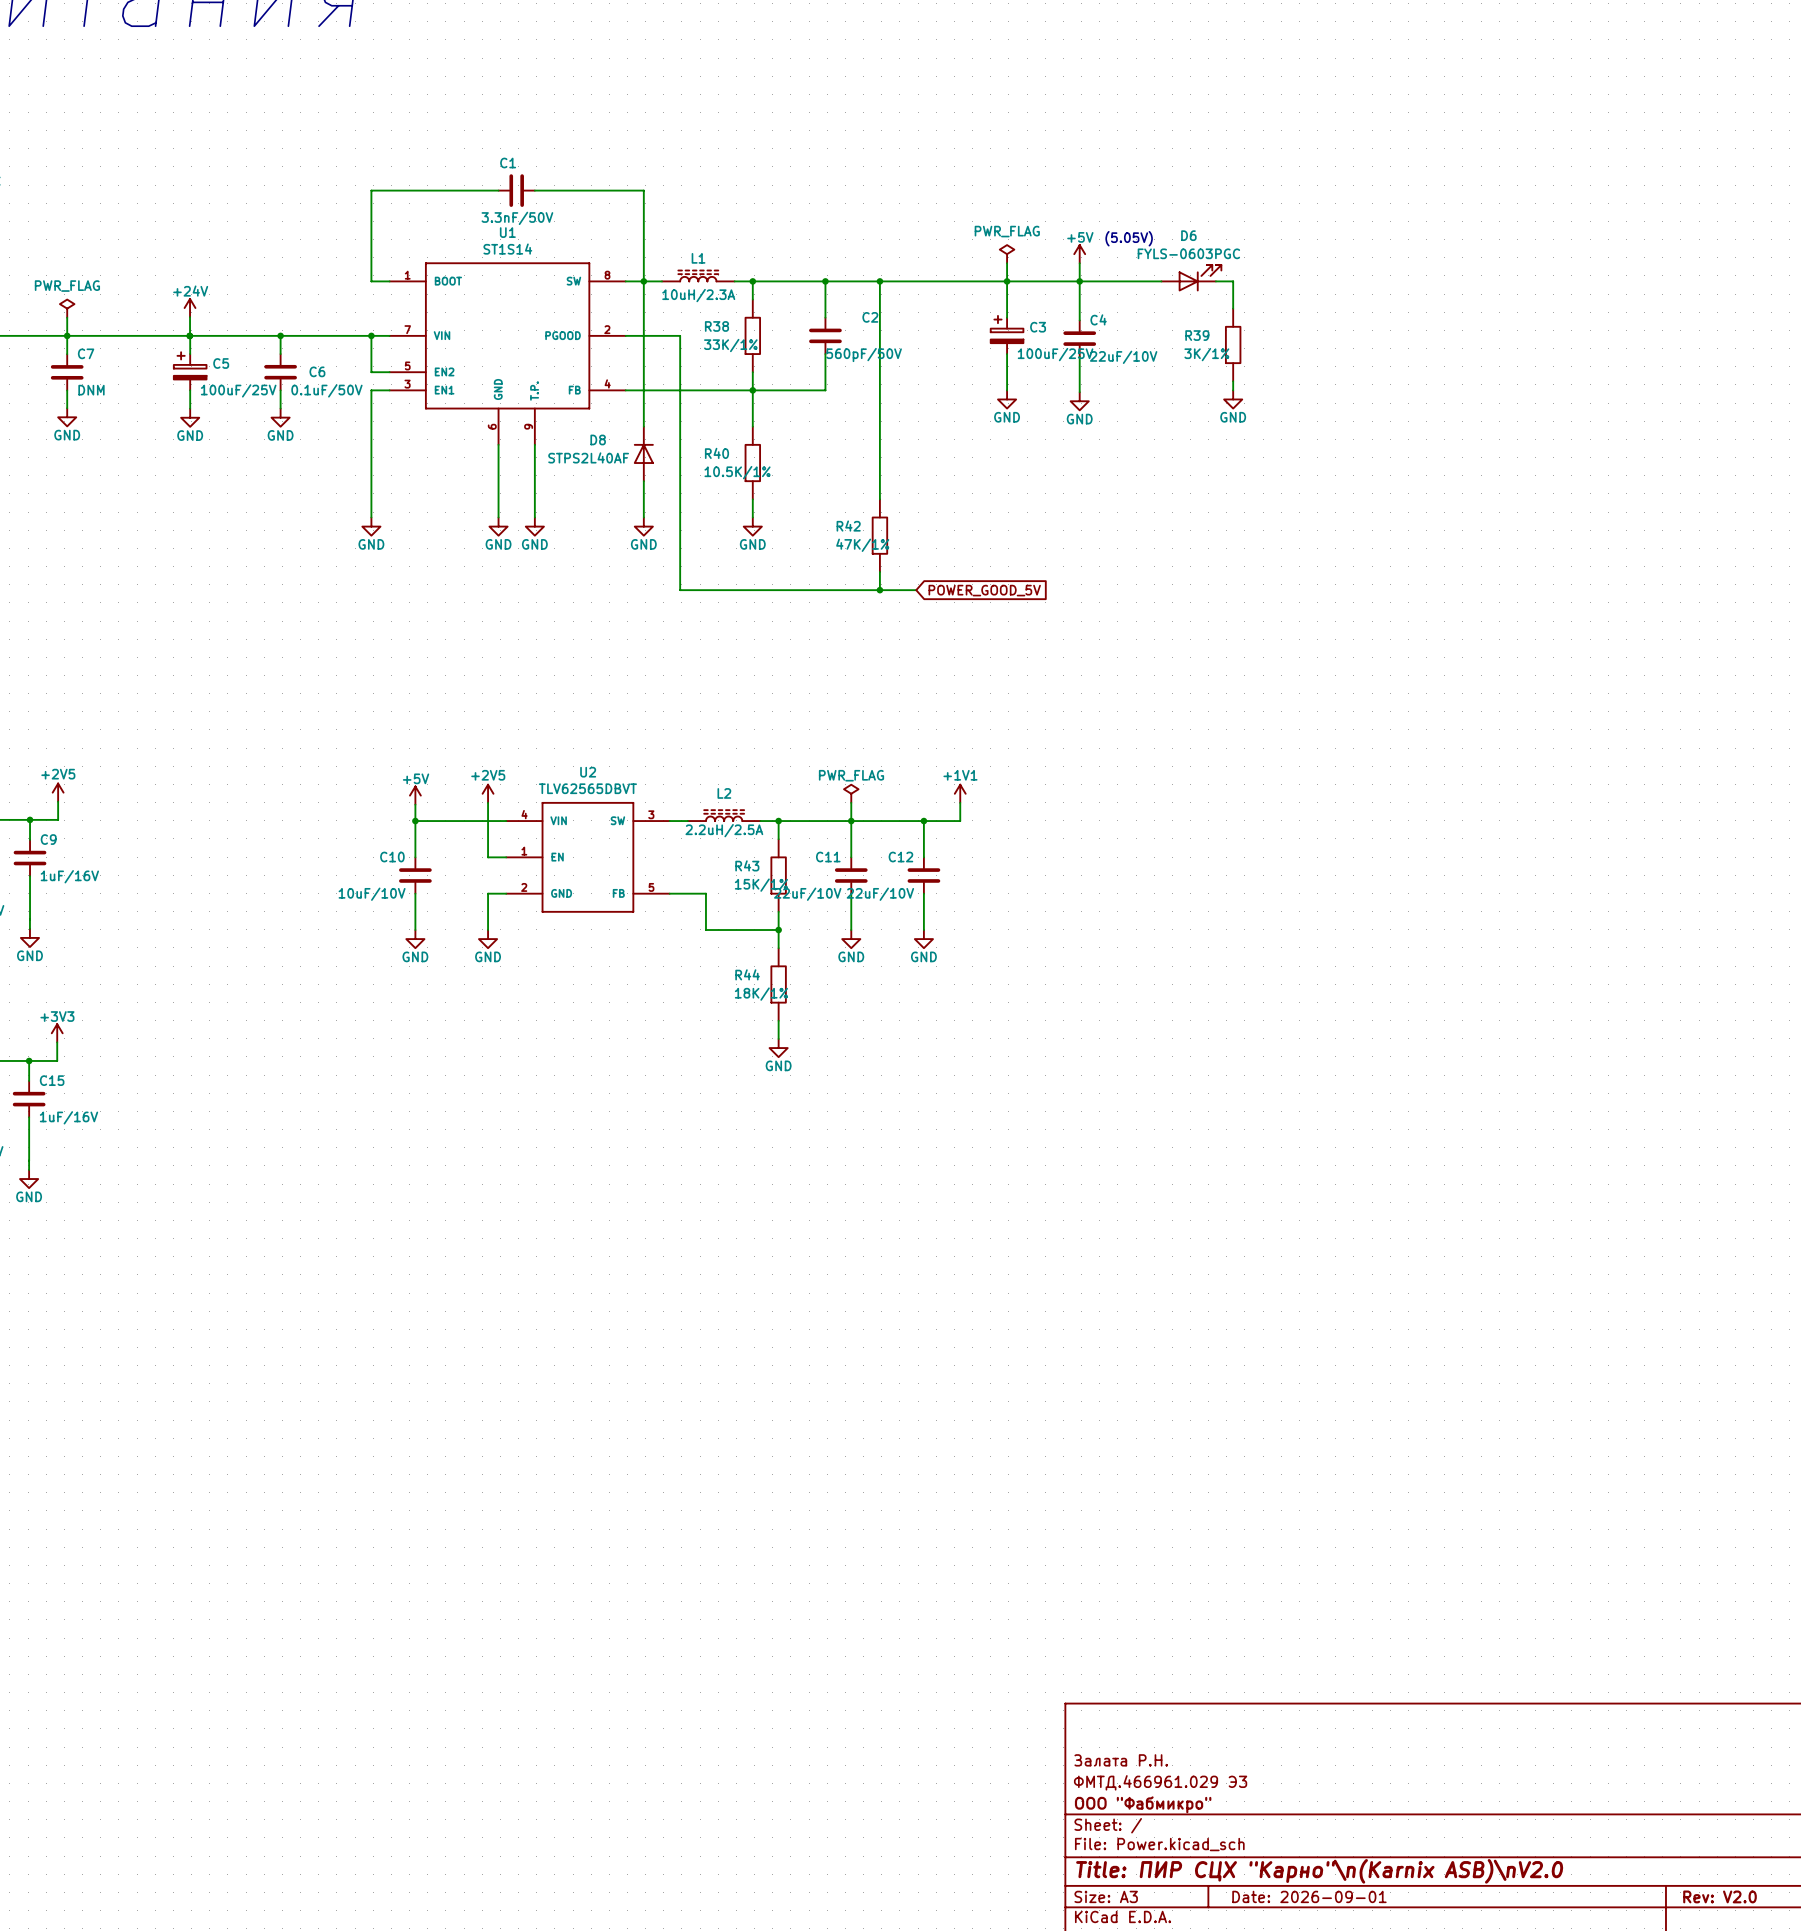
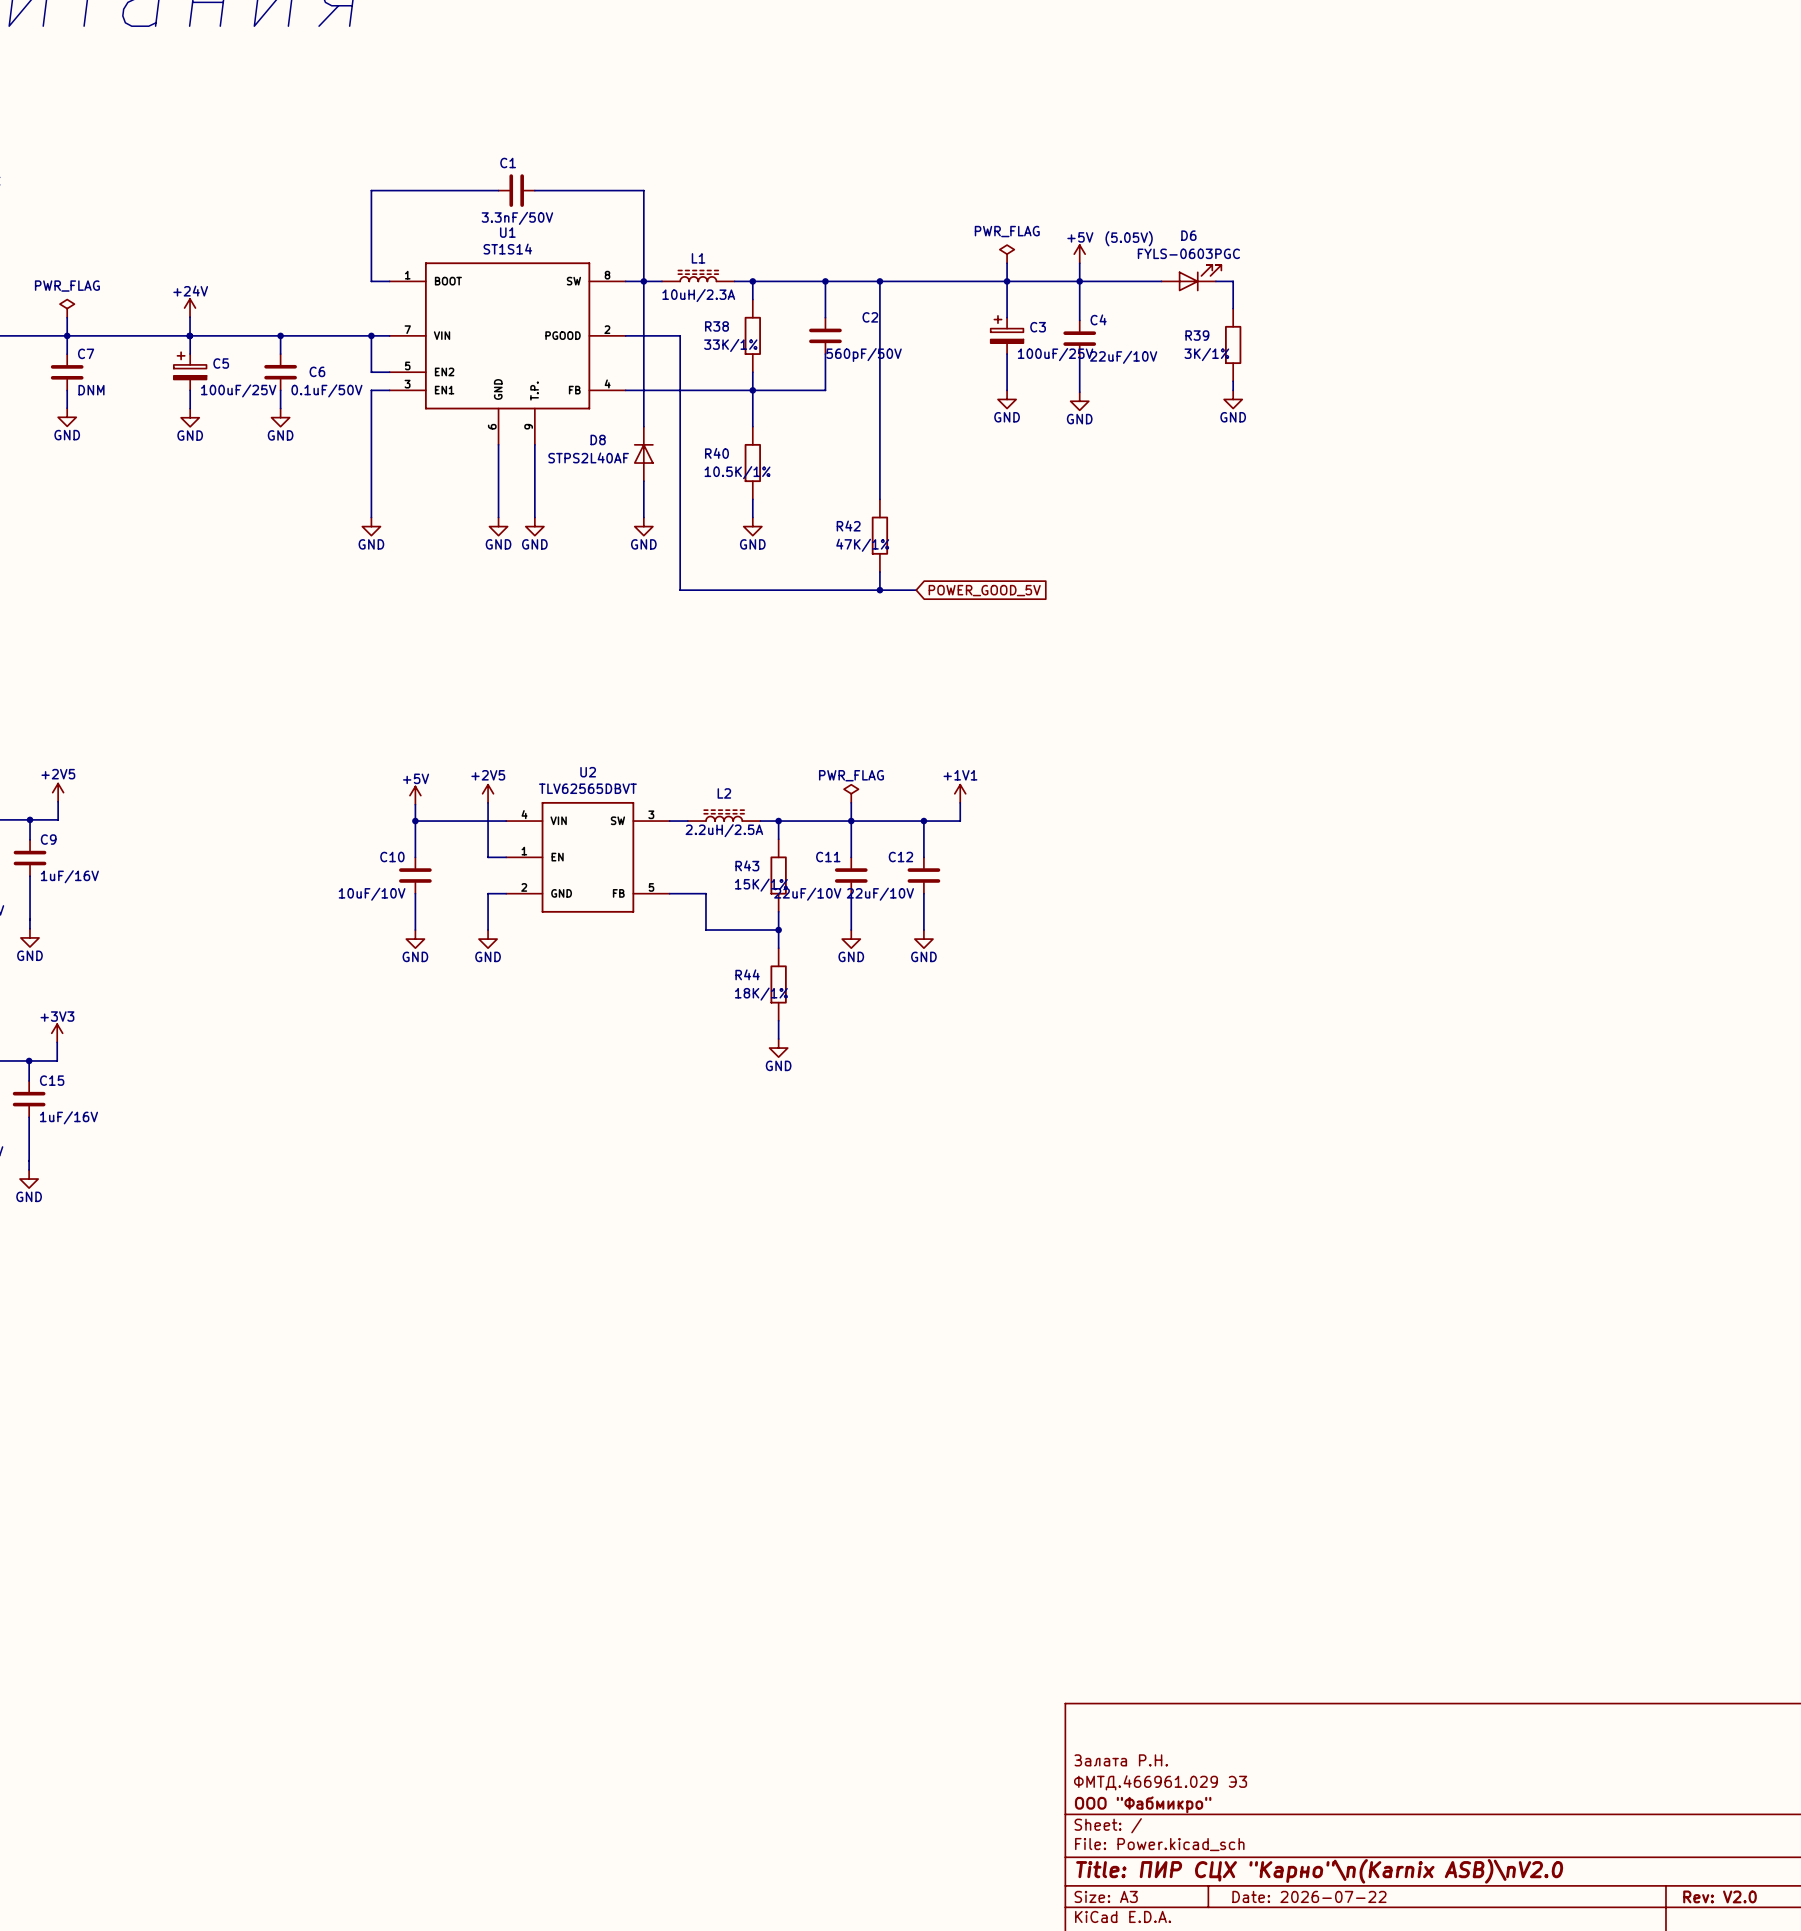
title block: Date: 2026-09-01 (1309, 1896) -> Date: 2026-07-22 (1309, 1896)

